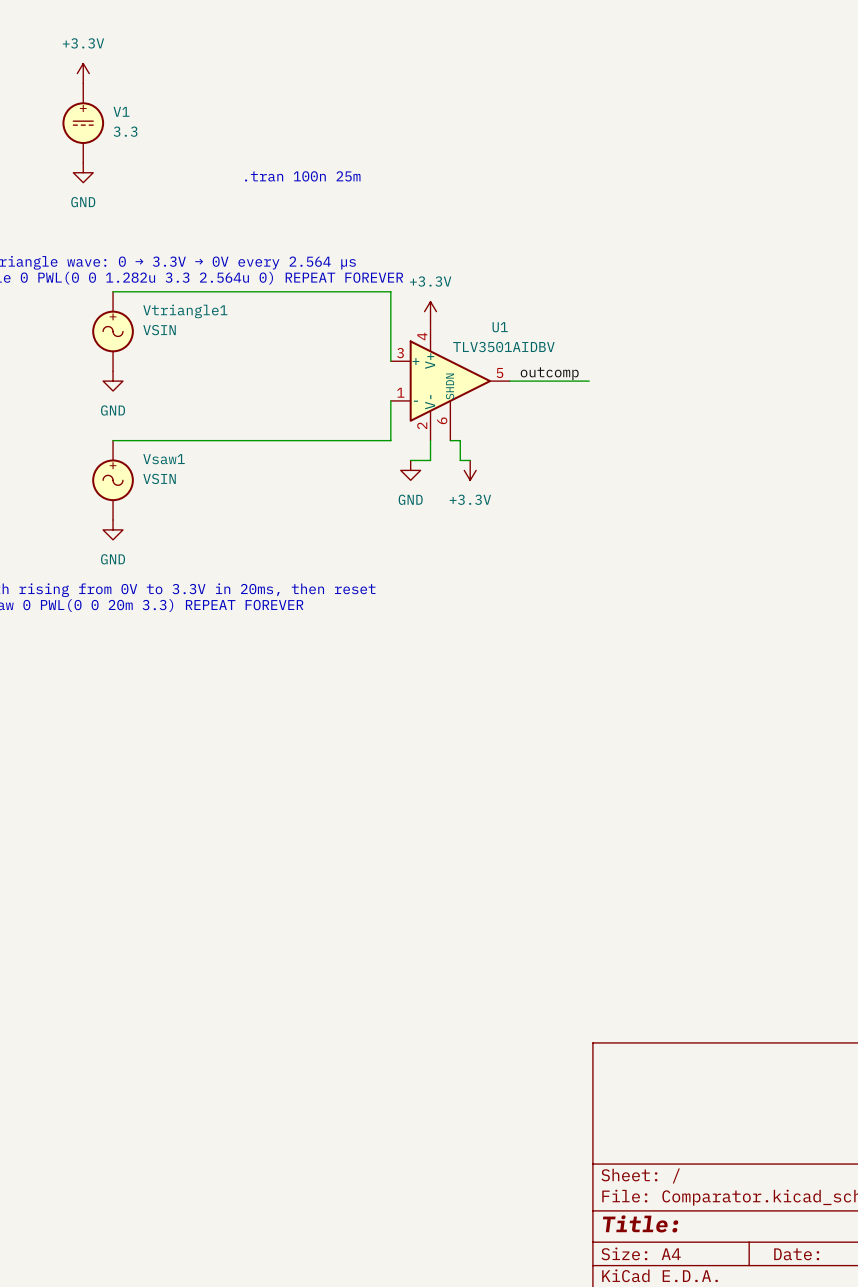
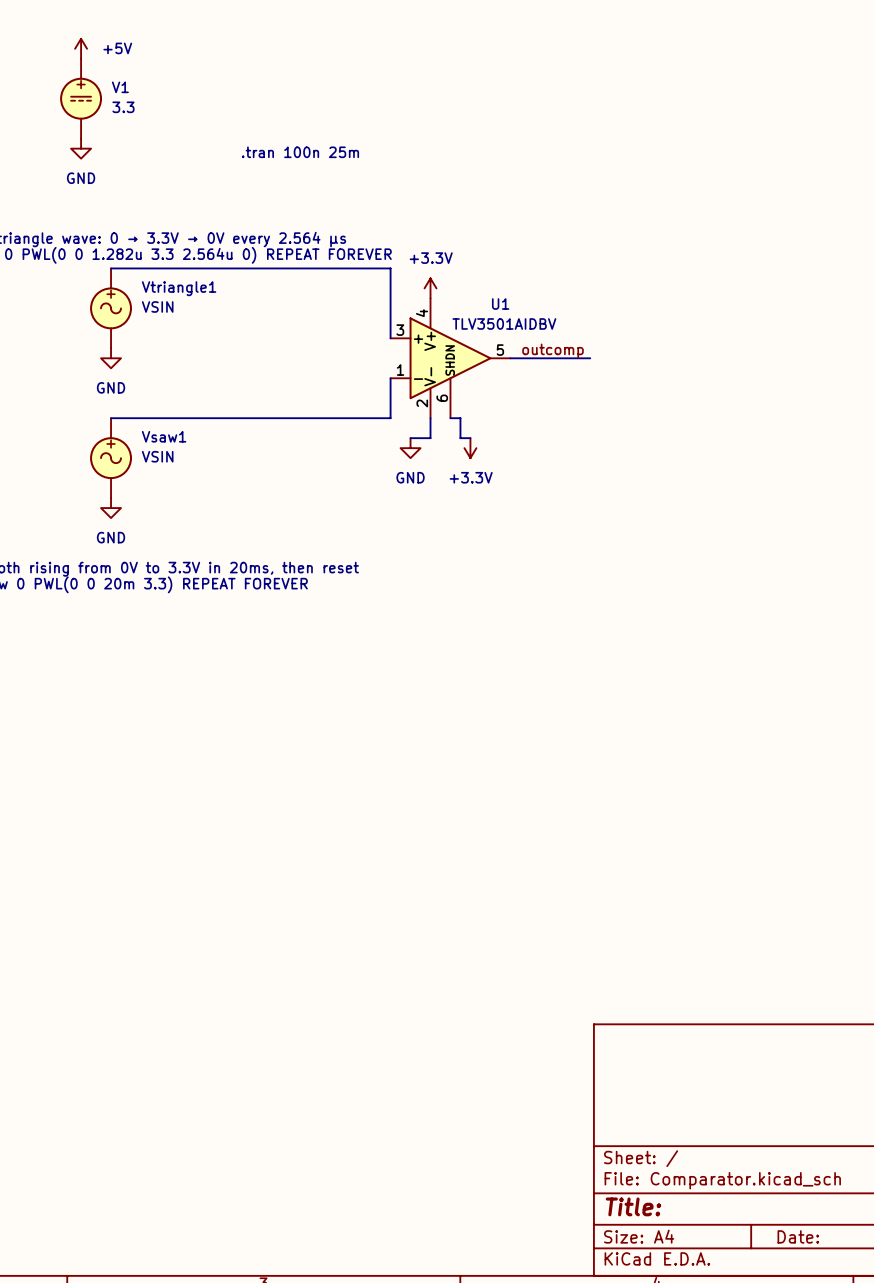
power symbol: +3.3V (83, 73) -> +5V (81, 48)

